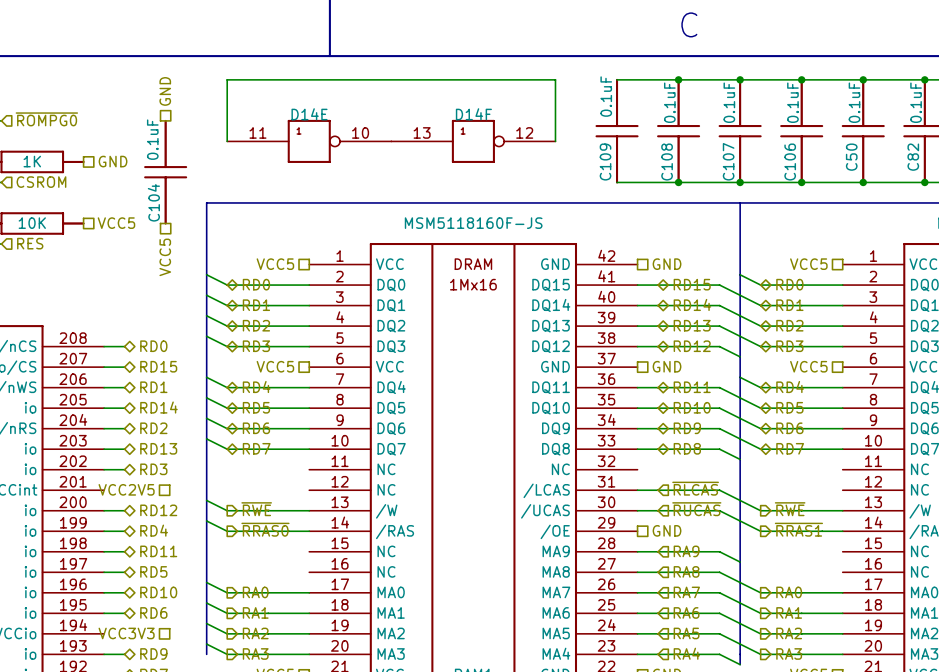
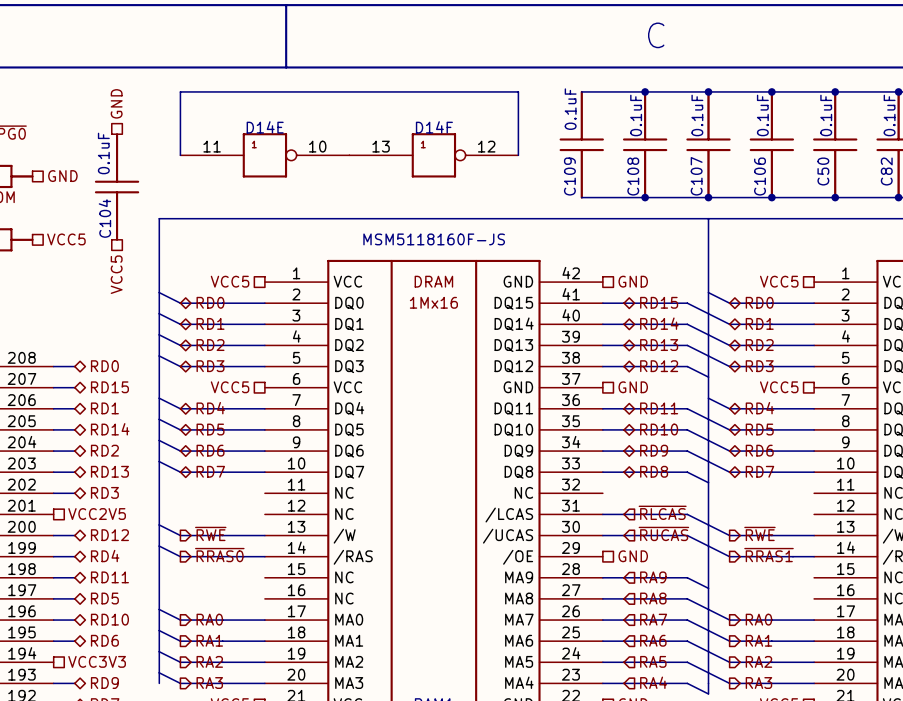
hierarchical label rotation: 0° (126, 489) -> 180° (97, 514)
hierarchical label rotation: 0° (126, 633) -> 180° (97, 661)

